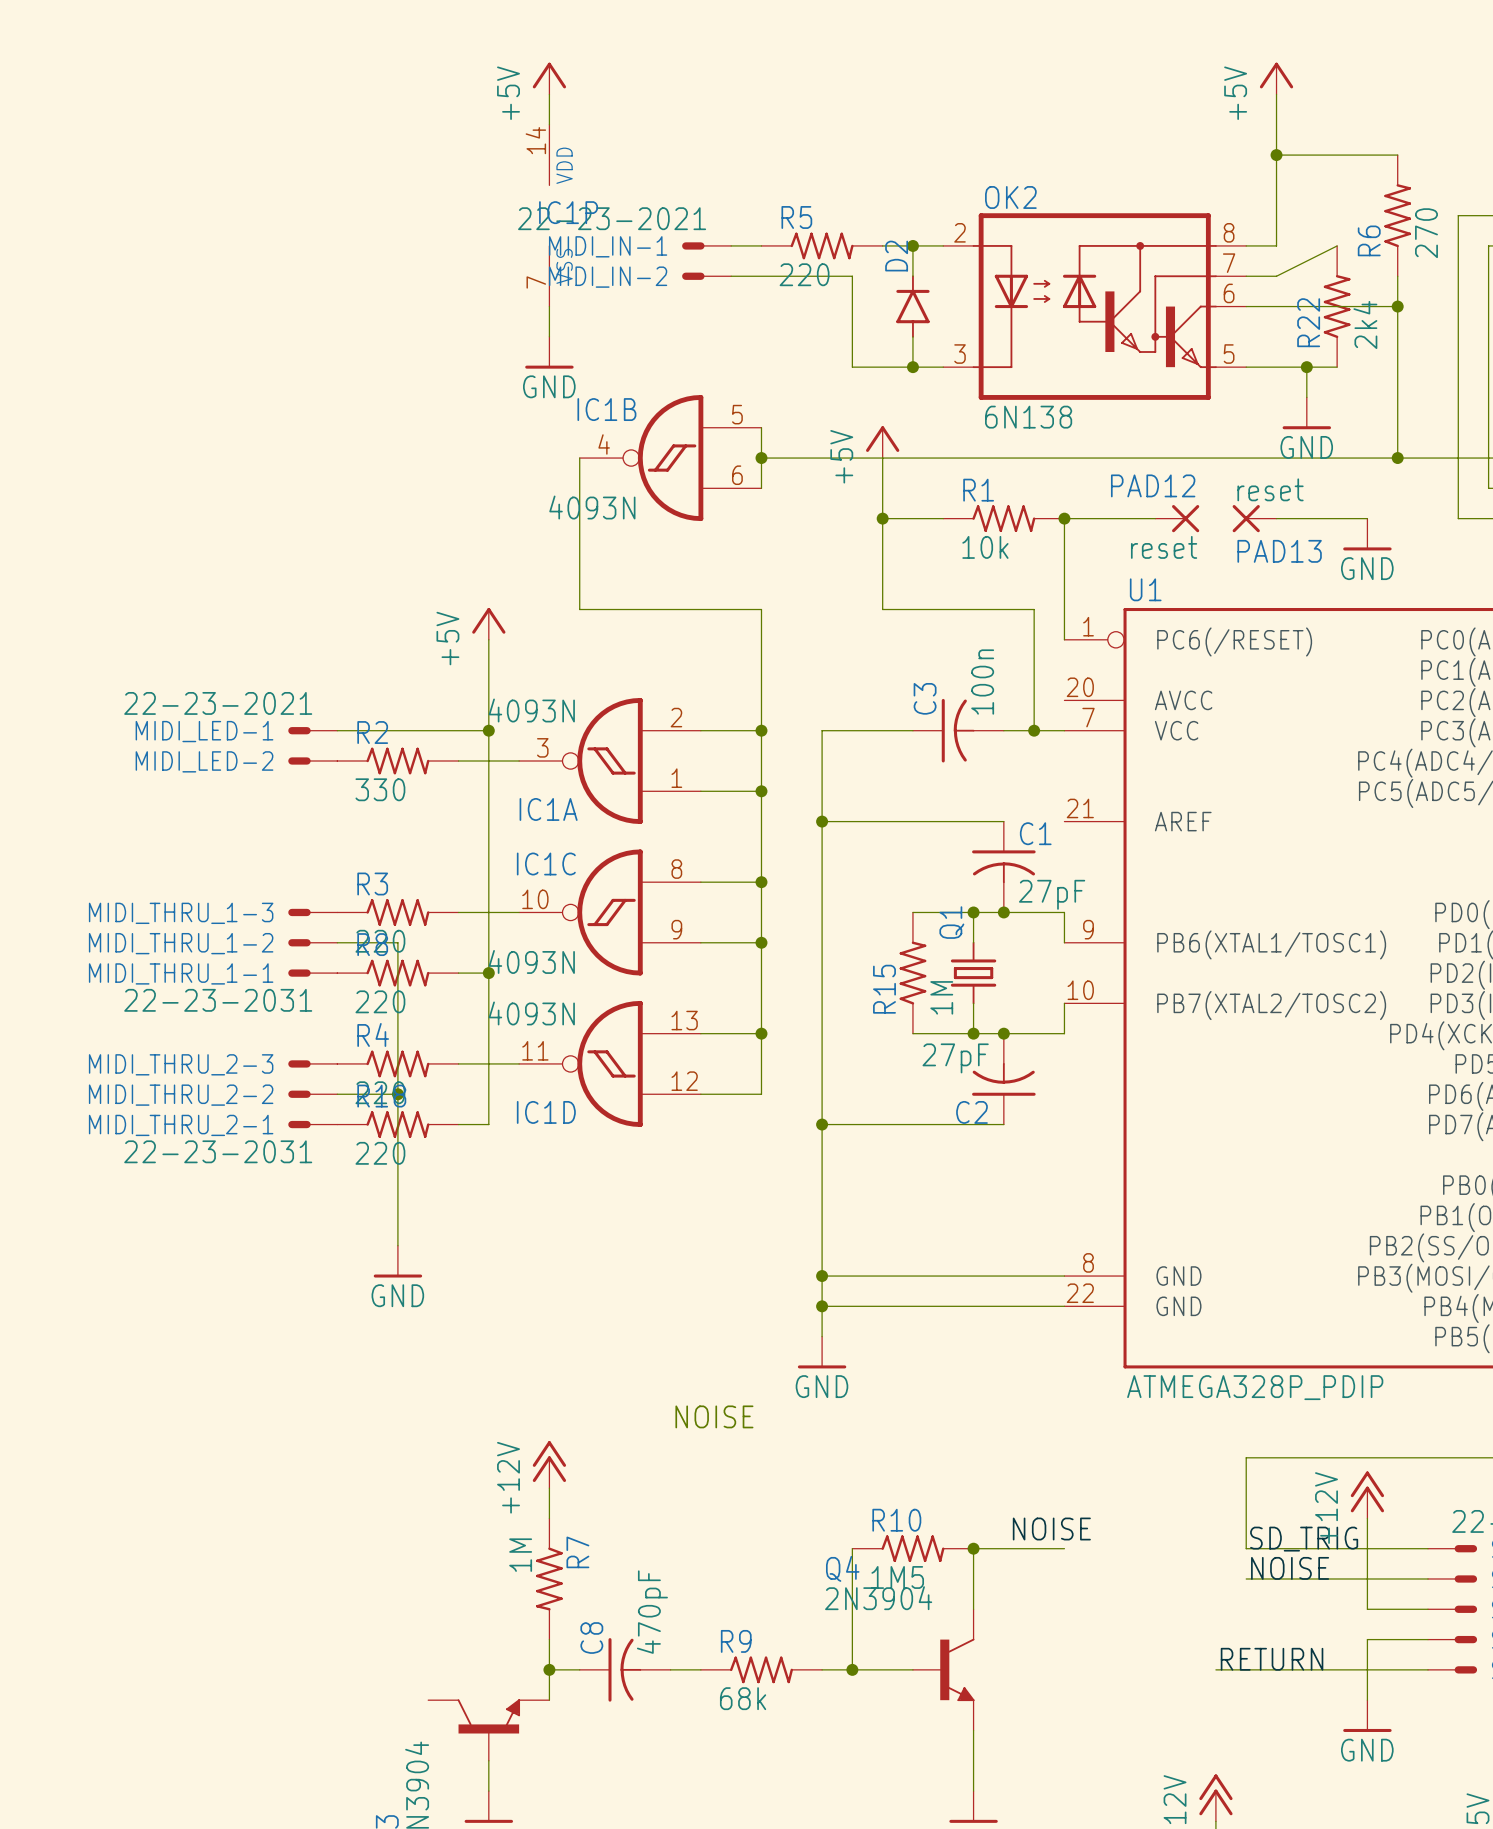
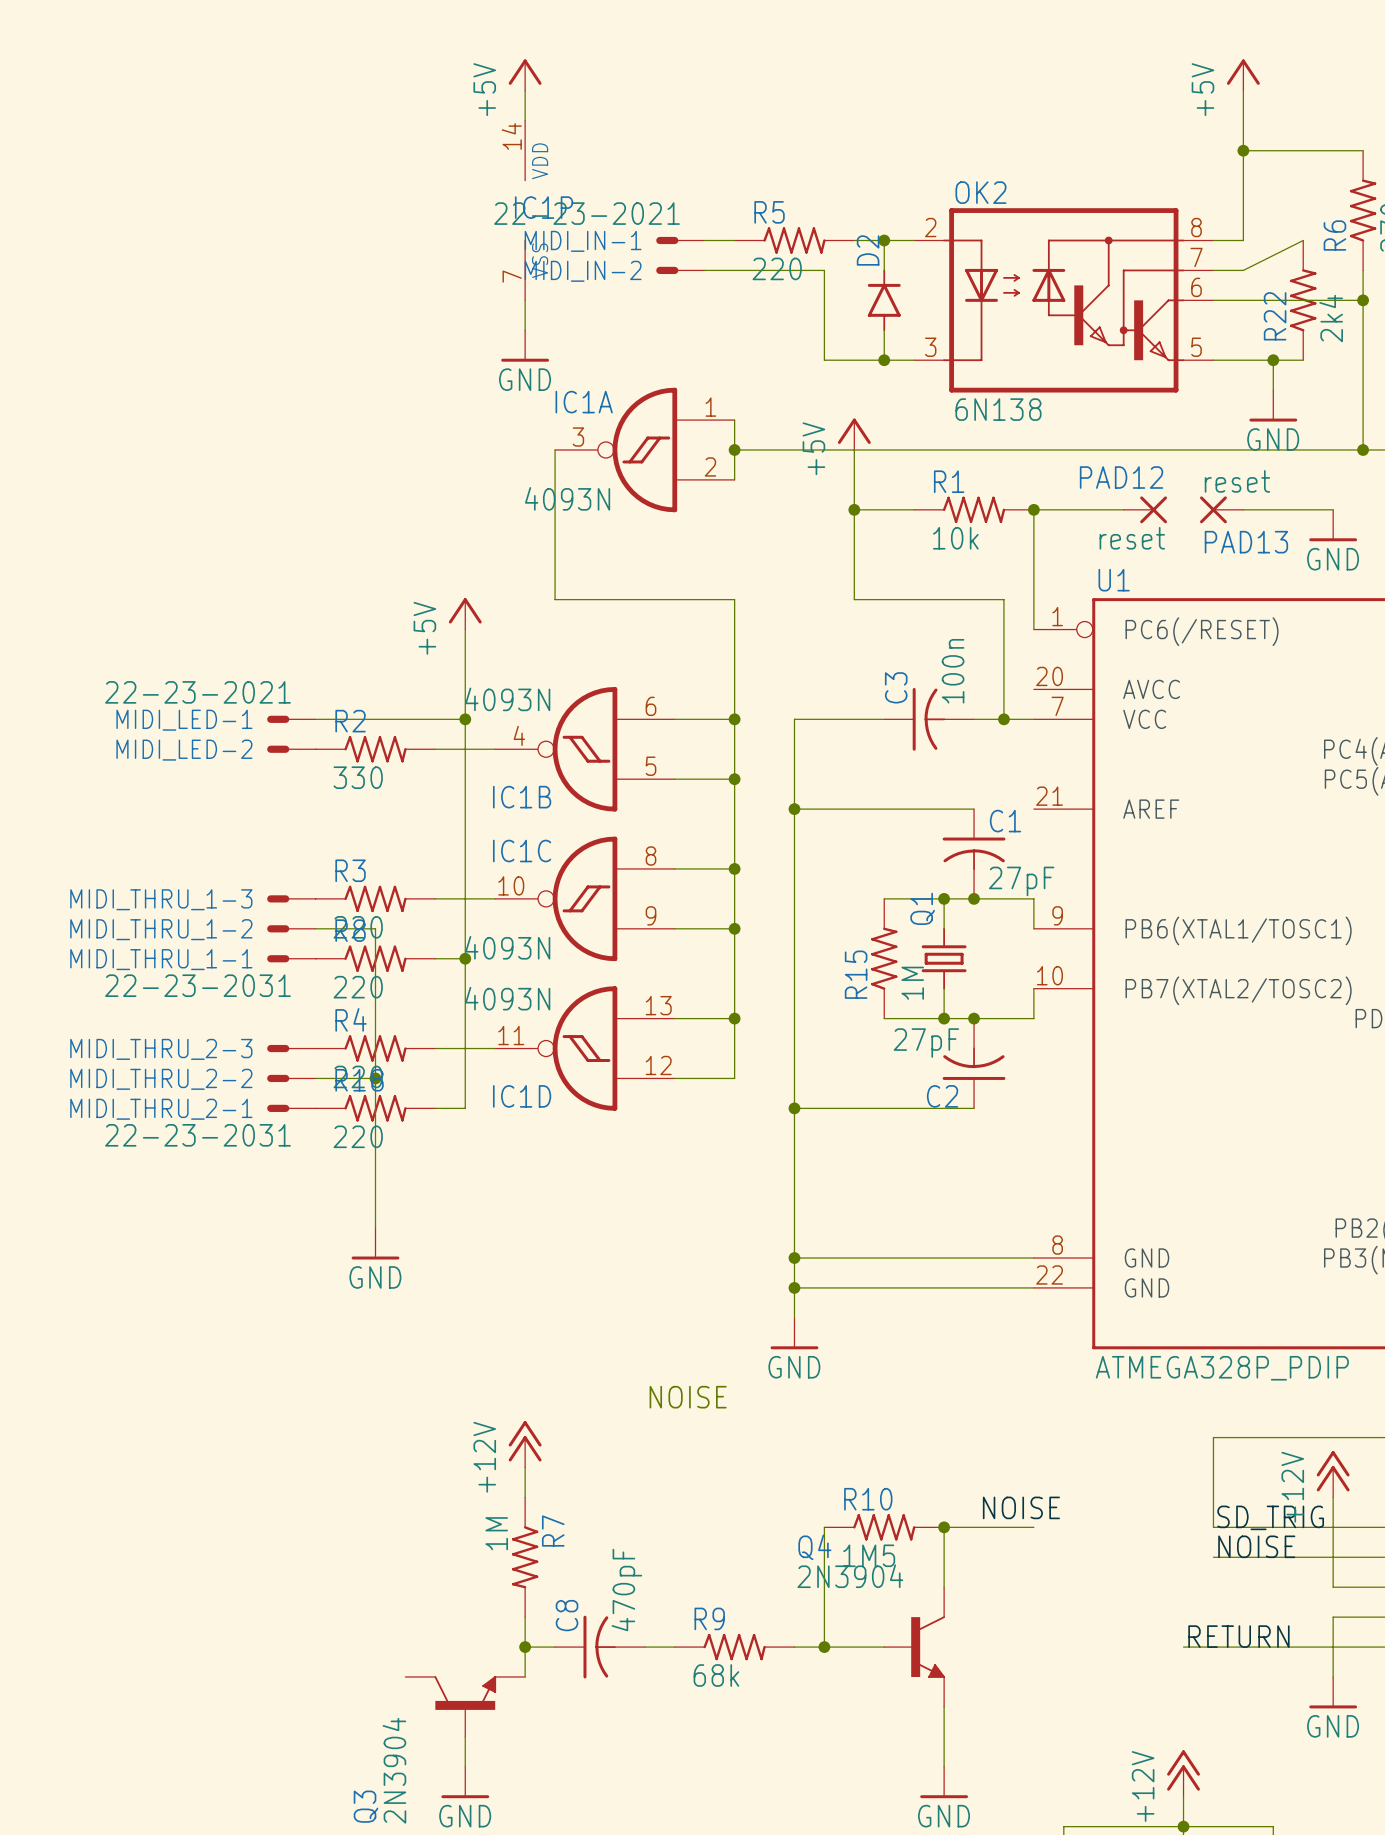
IC1B flip: as is (670, 458) -> up-down (584, 749)
IC1B position: (670, 458) -> (584, 749)
IC1A flip: as is (610, 760) -> up-down (644, 449)
IC1A position: (610, 760) -> (644, 449)

